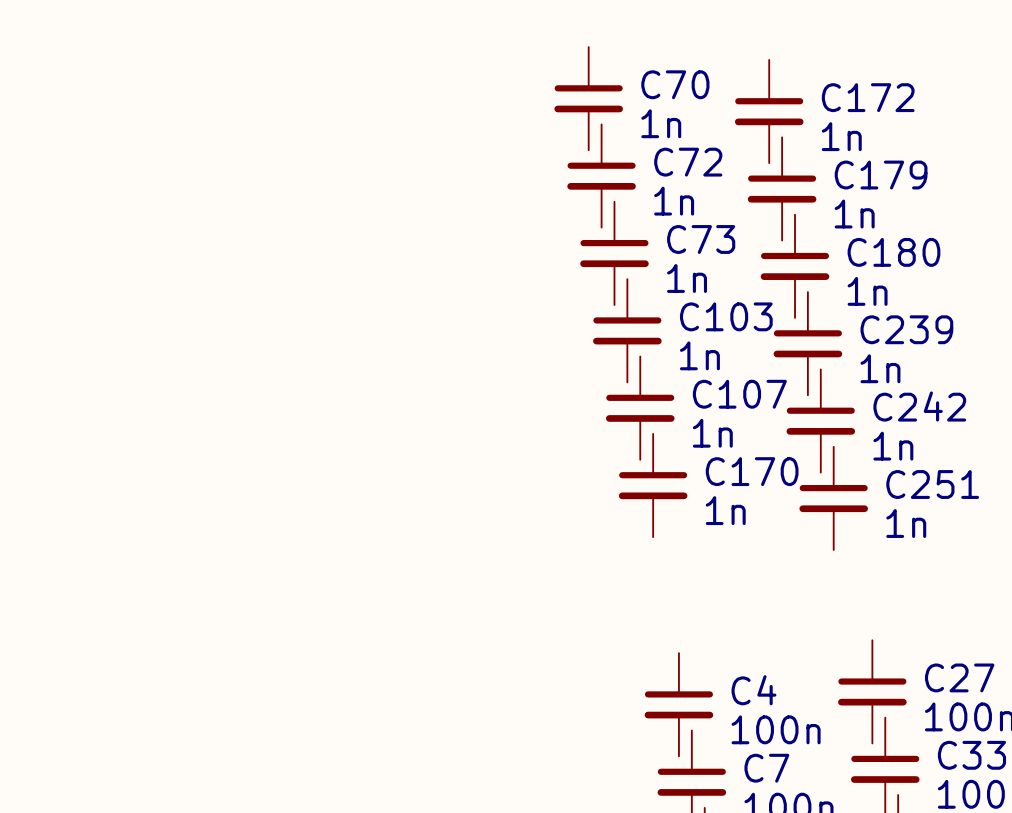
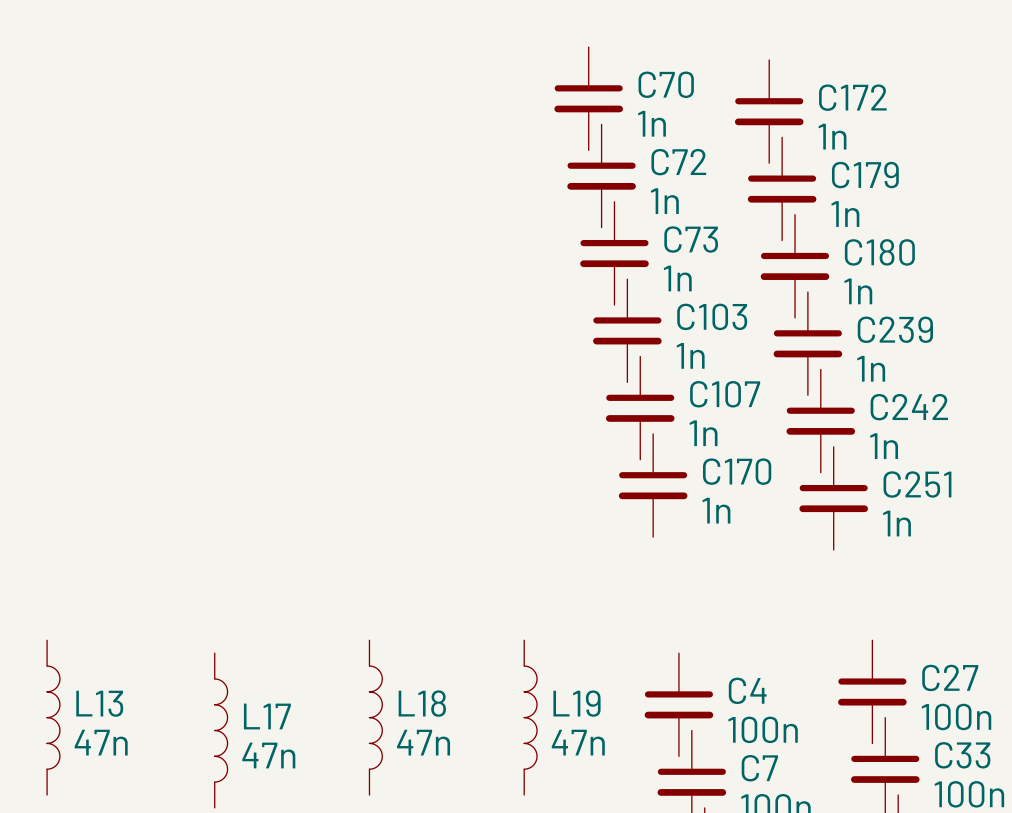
L13: none -> 47n (53, 717)
L18: none -> 47n (375, 717)
L19: none -> 47n (530, 717)
L17: none -> 47n (221, 730)

